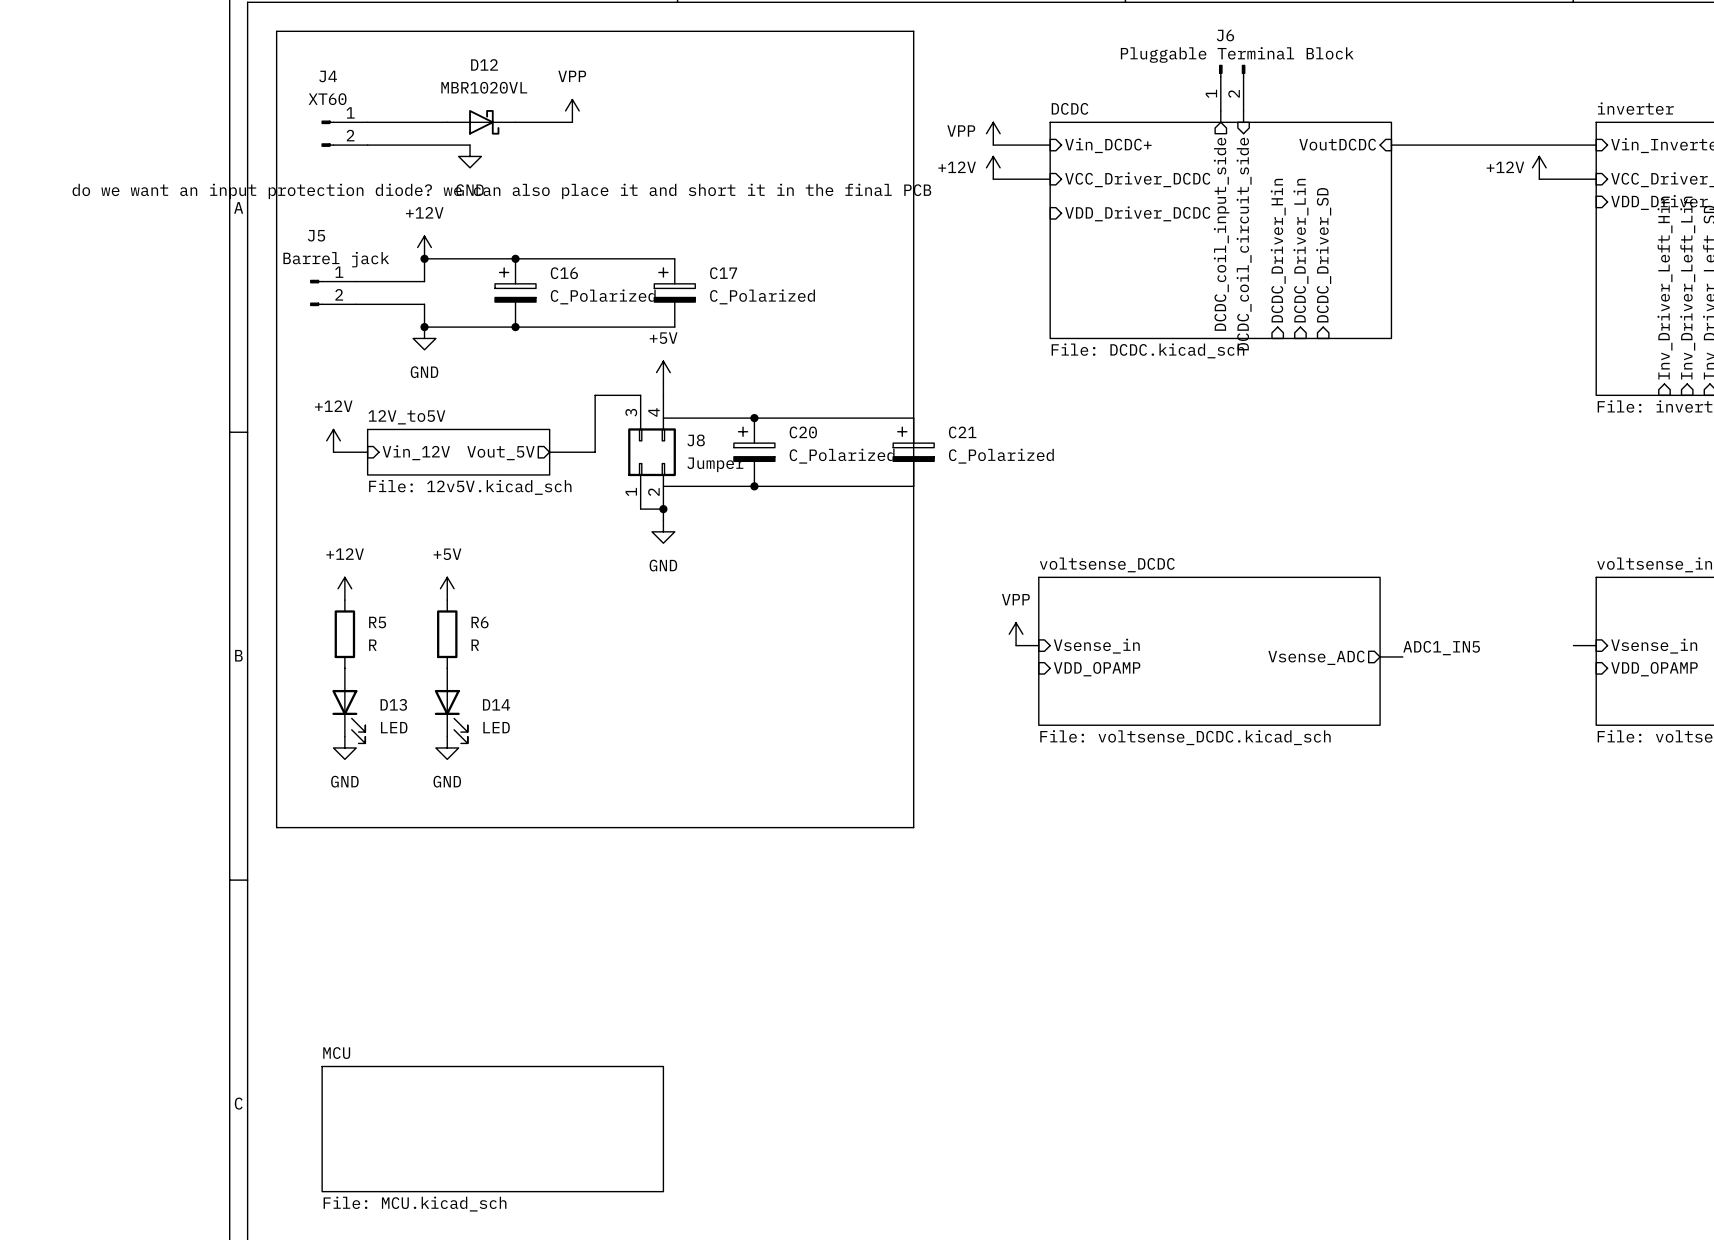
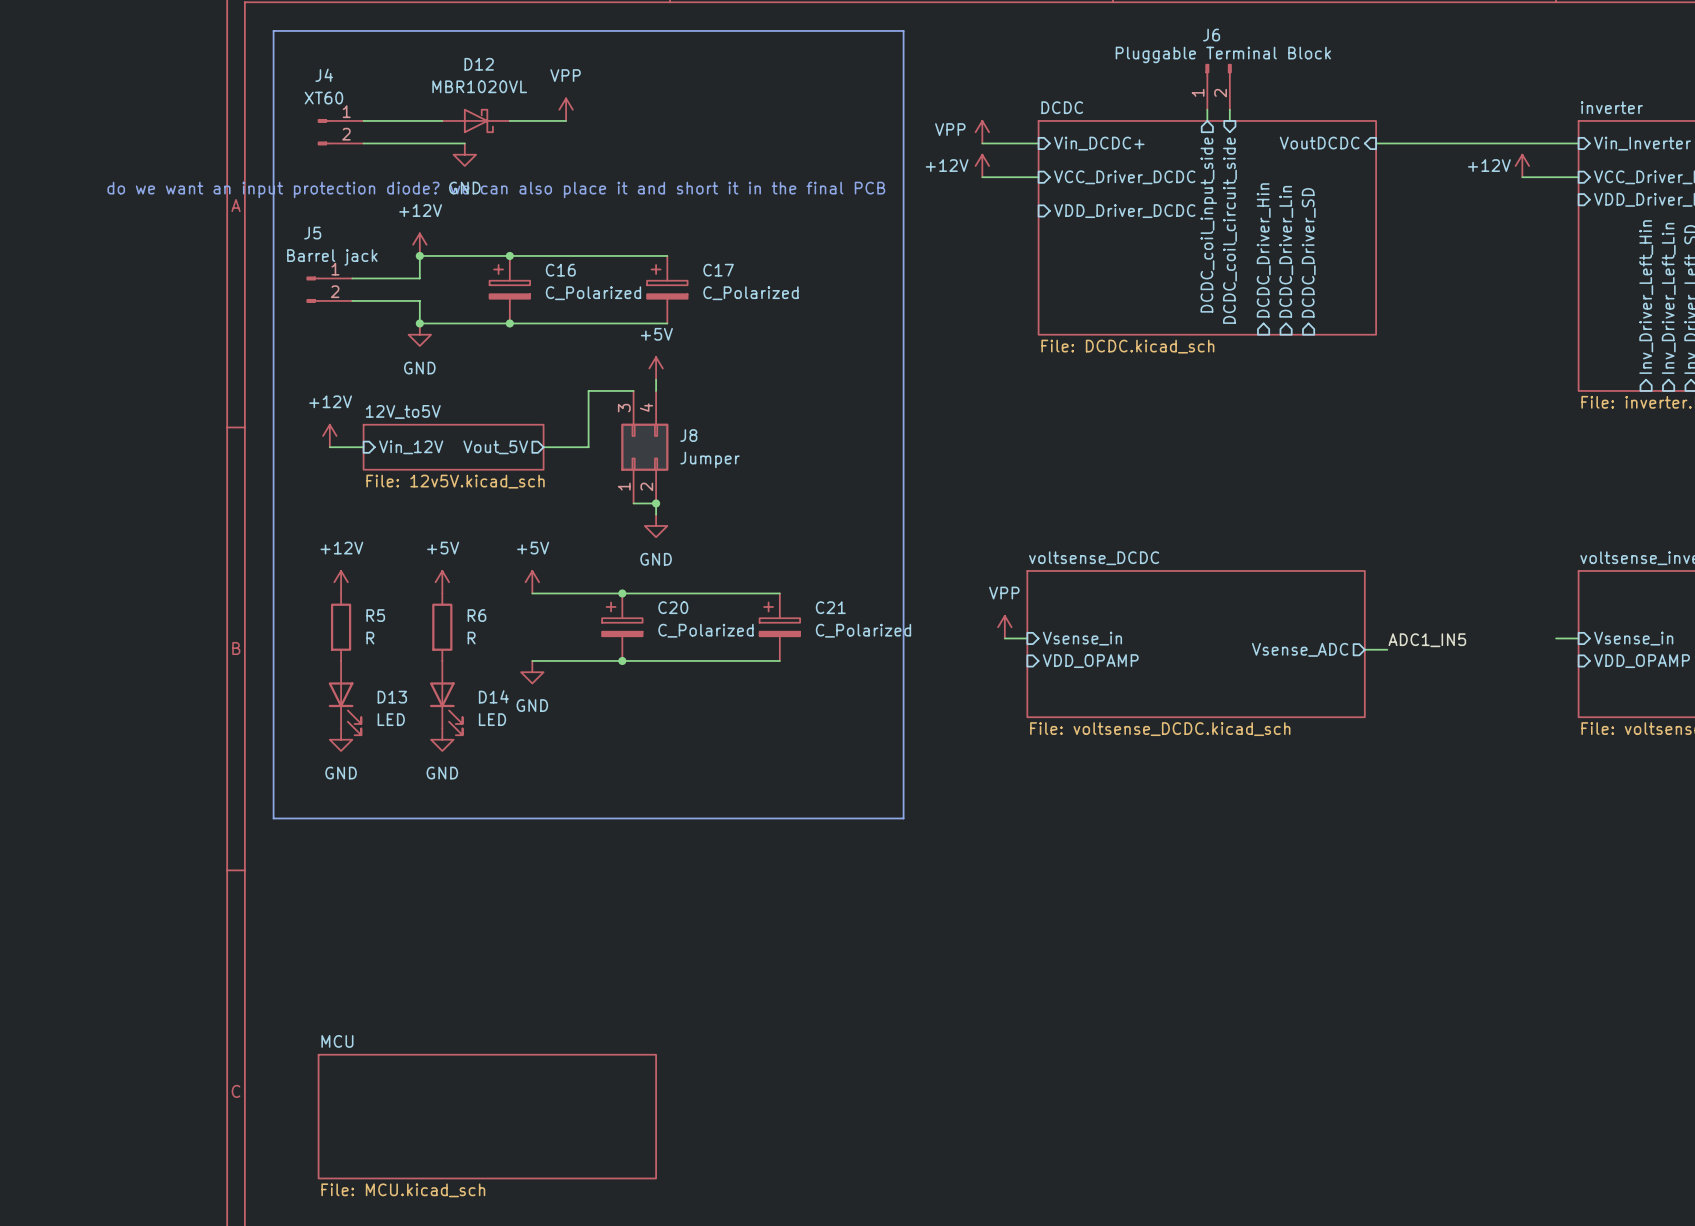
wire: (663, 418) (913, 418) -> none
junction: (754, 418) -> none
C20 position: (754, 452) -> (622, 627)
C21 position: (913, 452) -> (779, 627)
wire: (663, 486) (913, 486) -> (532, 593) (779, 593)
junction: (754, 486) -> none
power symbol: none -> +5V (532, 582)
junction: none -> (622, 593)
wire: none -> (532, 660) (779, 660)
junction: none -> (622, 660)
power symbol: none -> GND (532, 672)

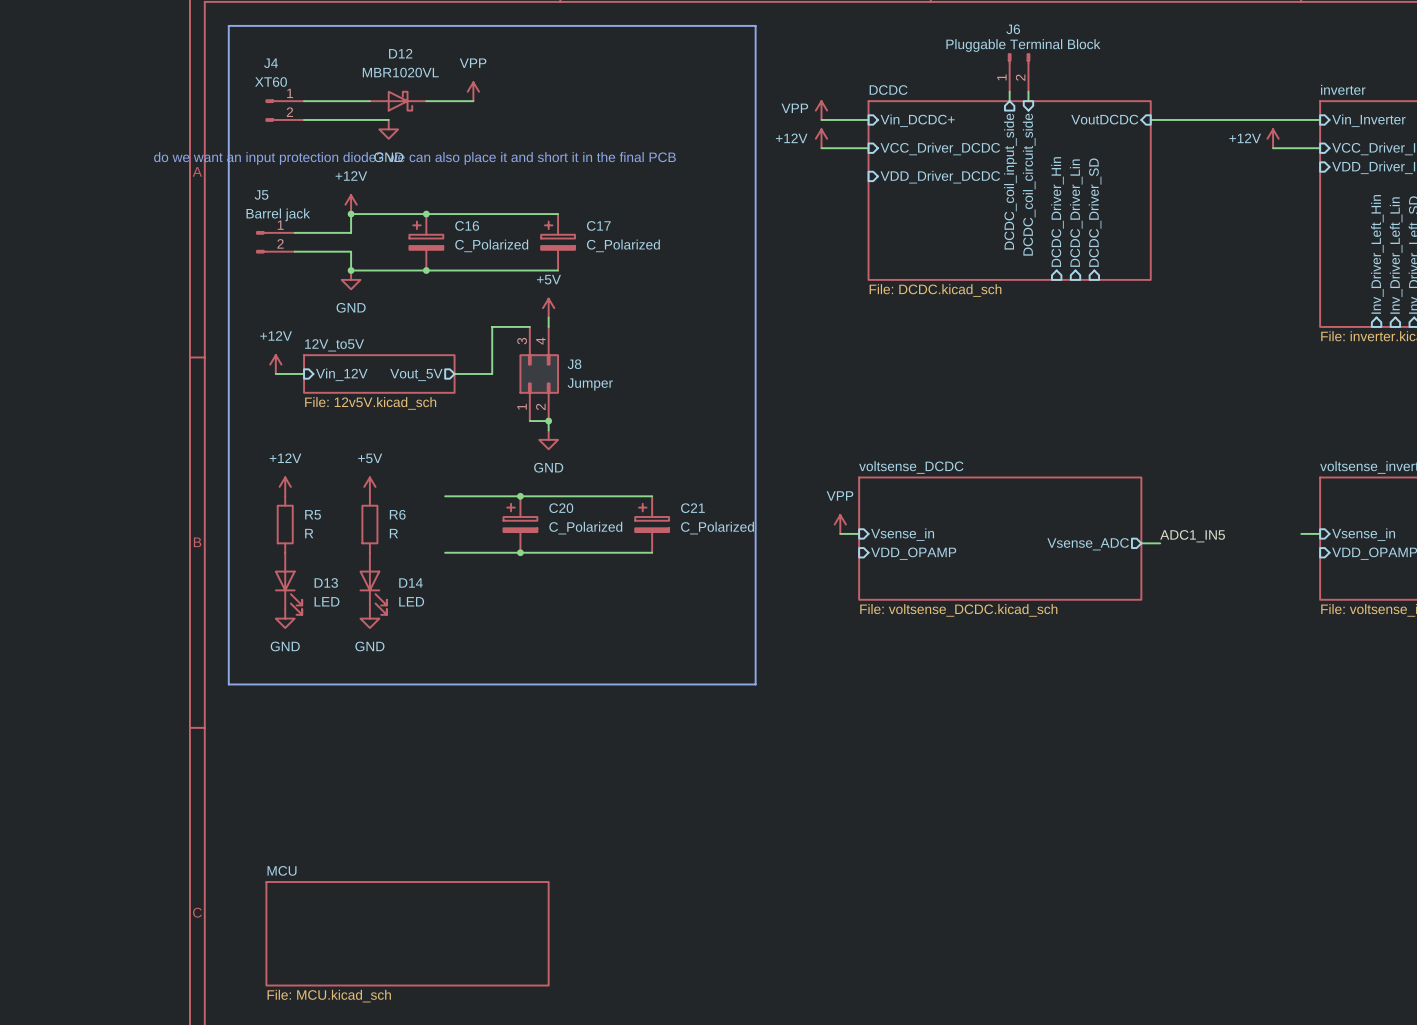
power symbol: +5V (532, 582) -> none
power symbol: GND (532, 672) -> none

